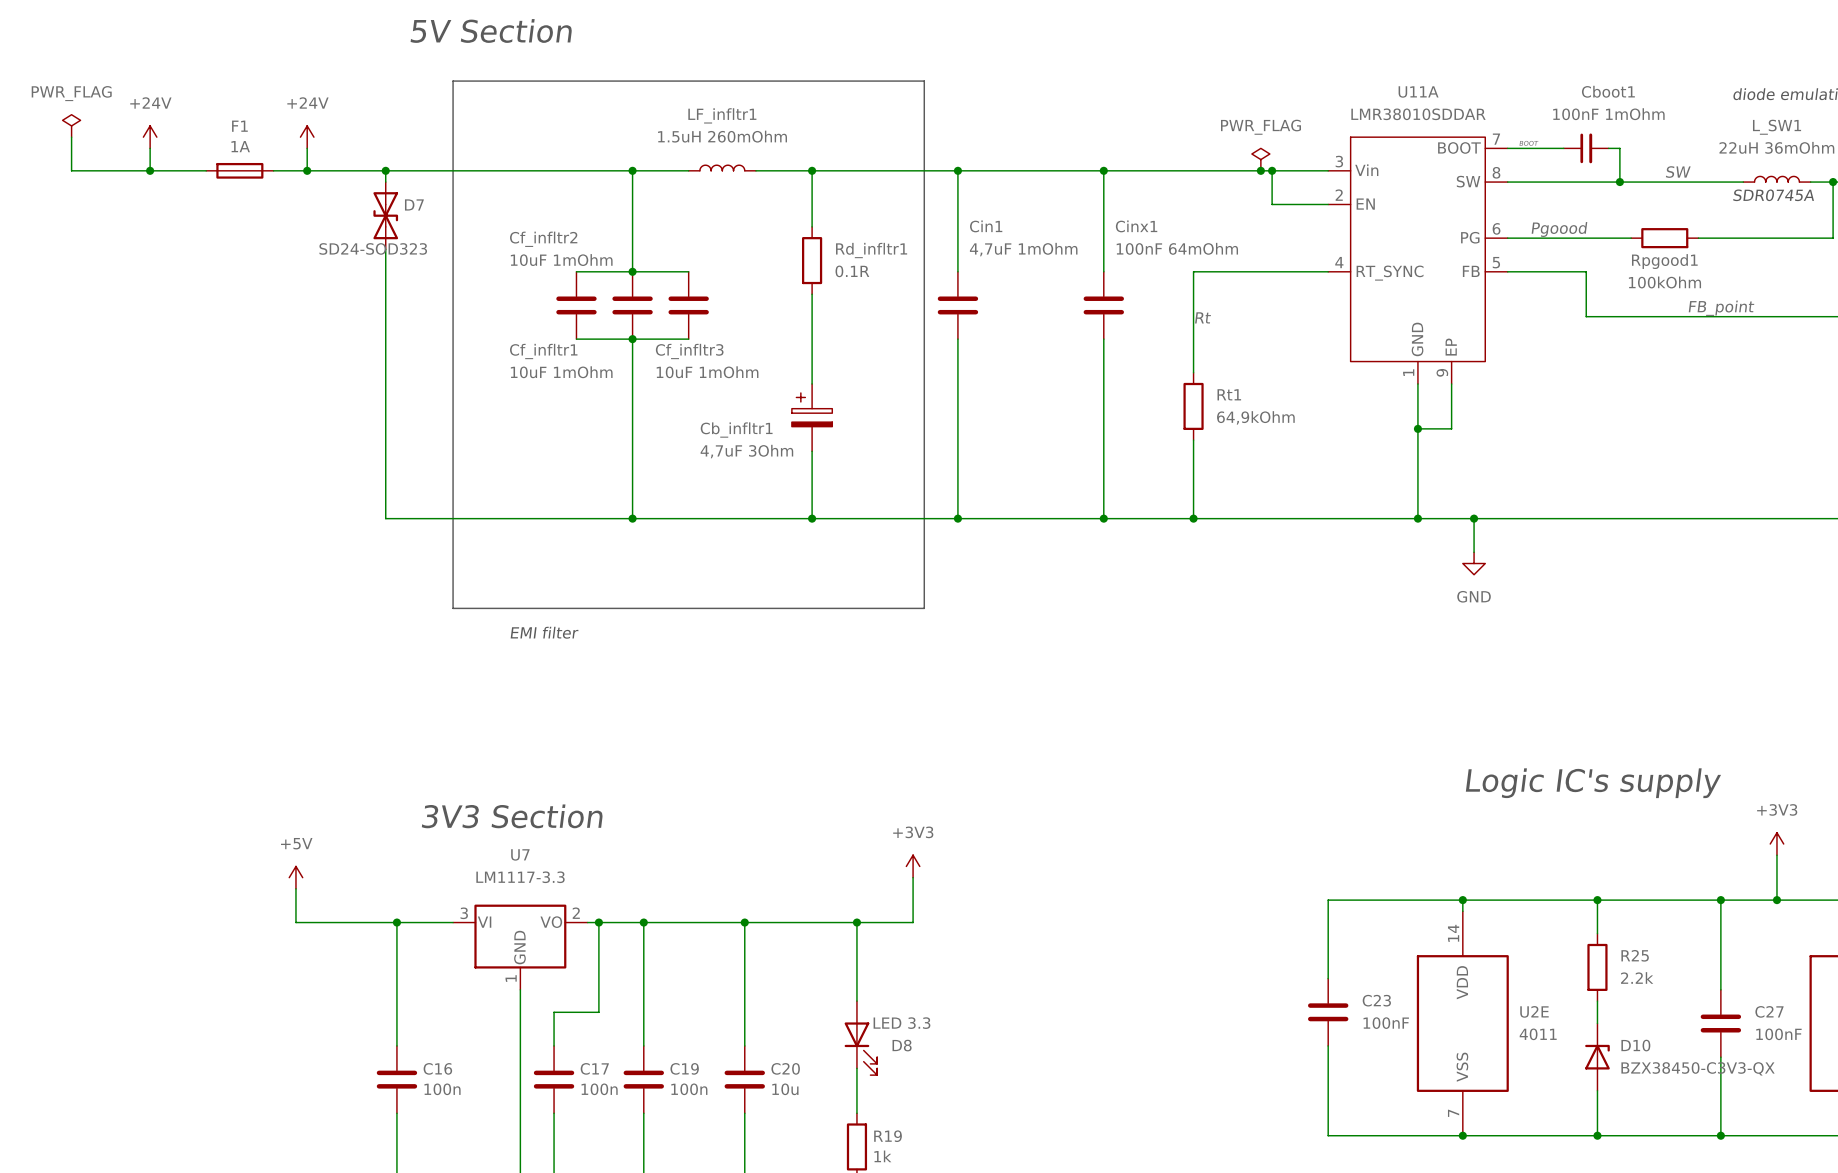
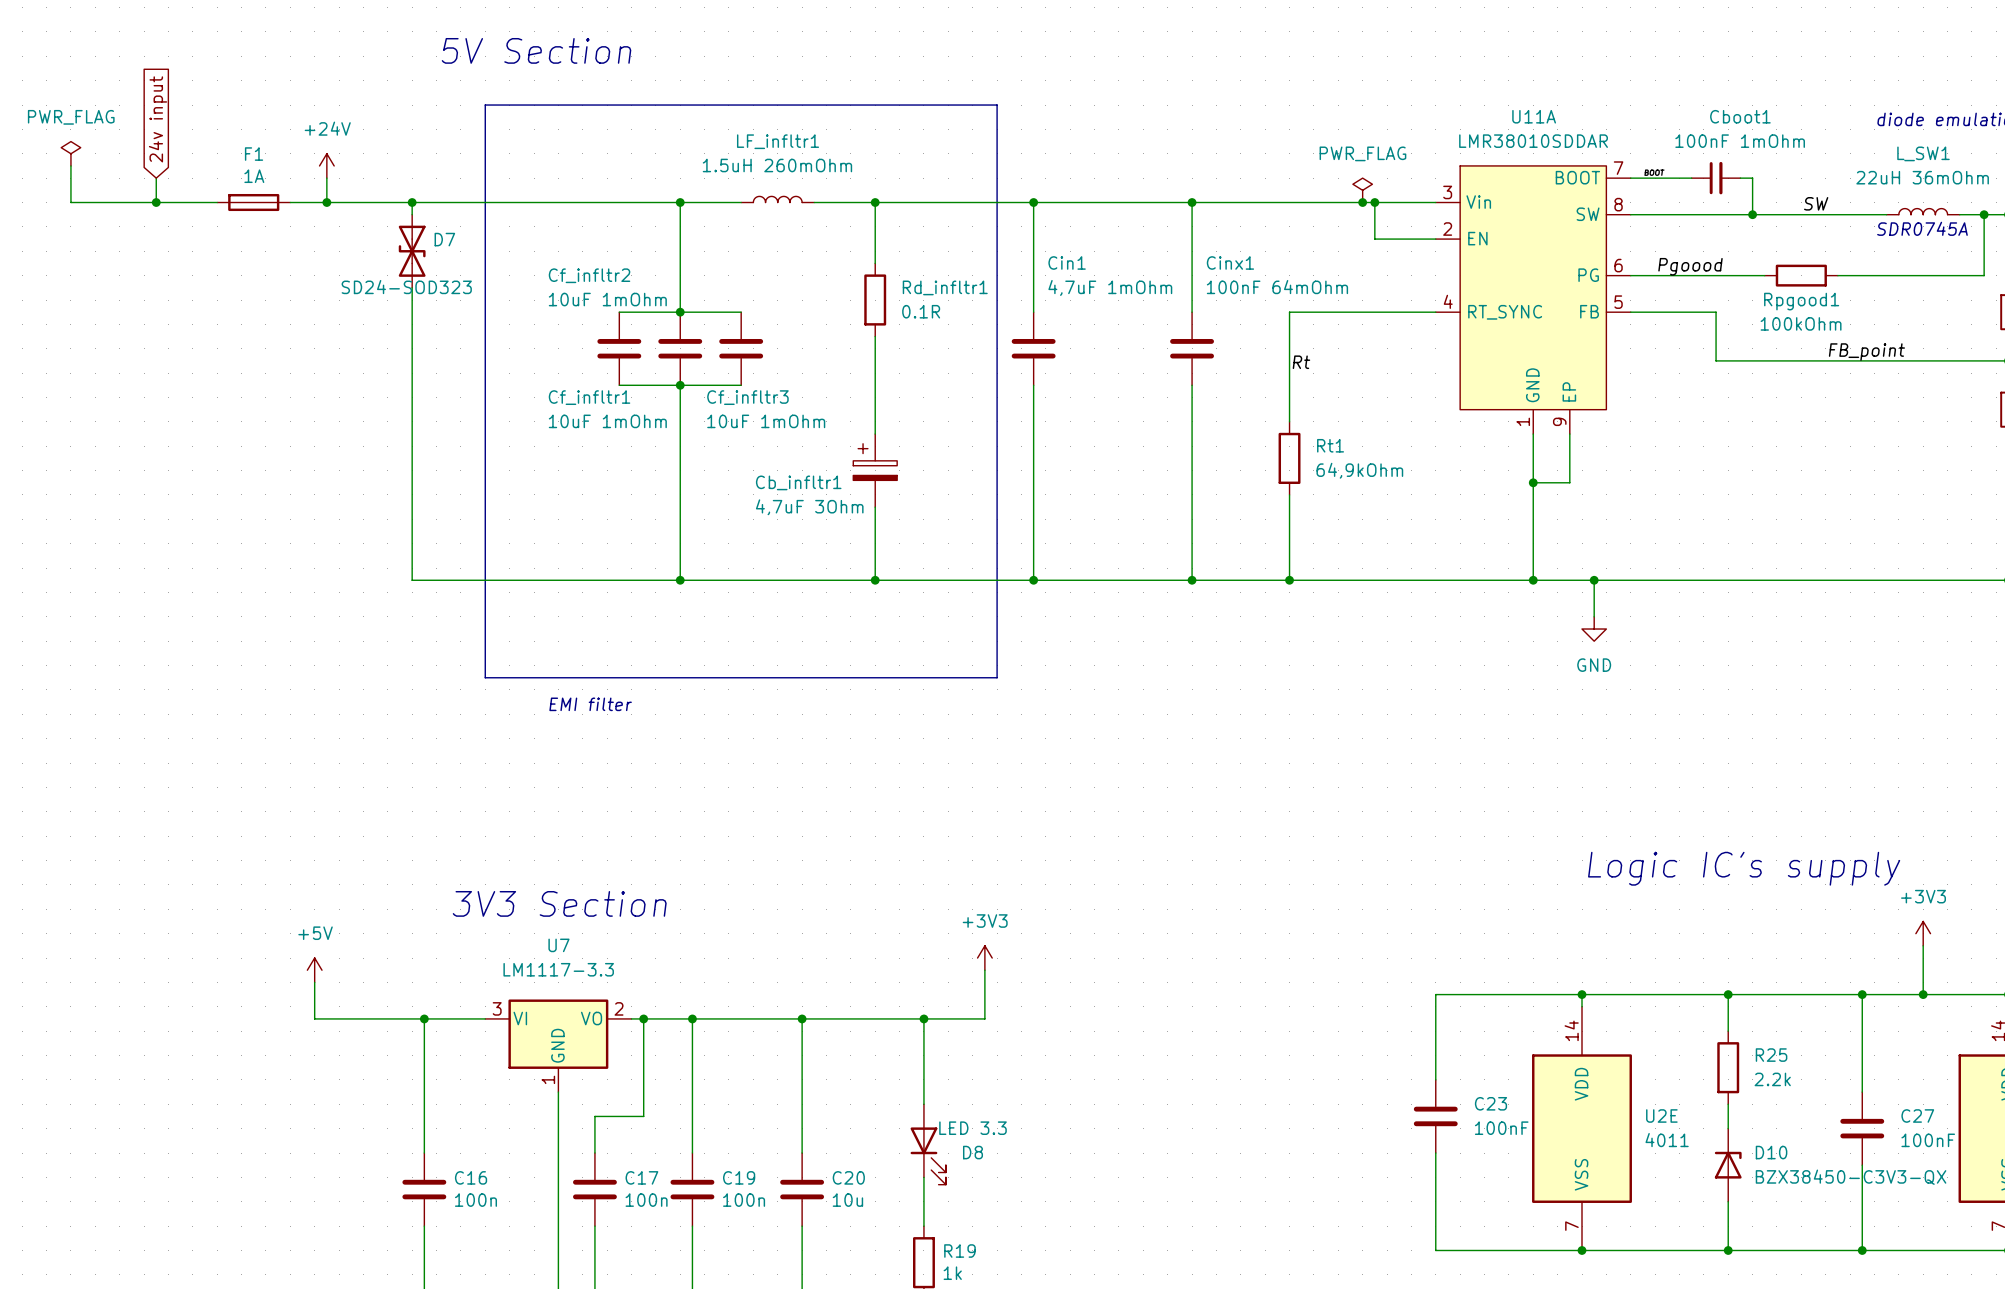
global label: none -> 24v input (158, 119)
power symbol: +24V (150, 137) -> none

